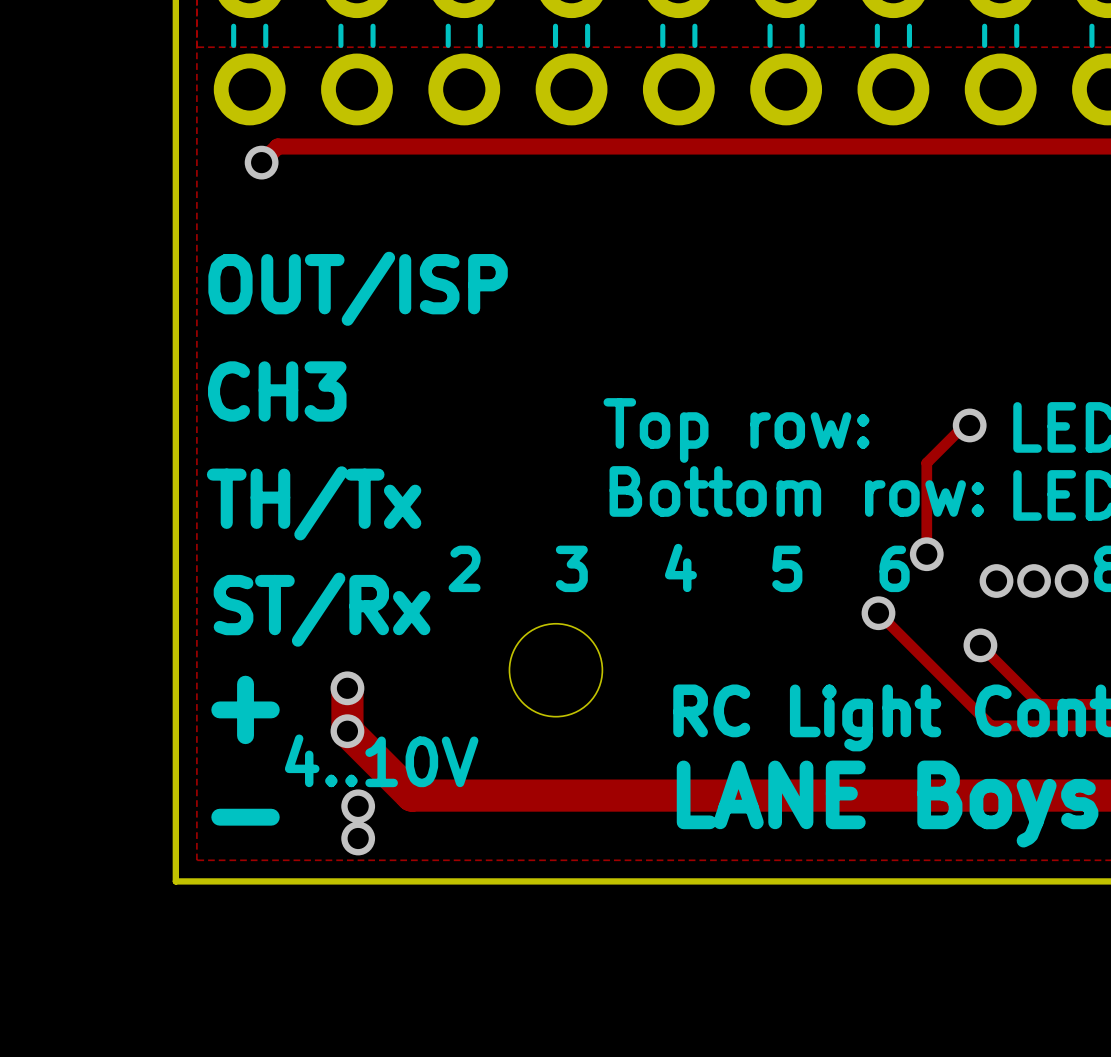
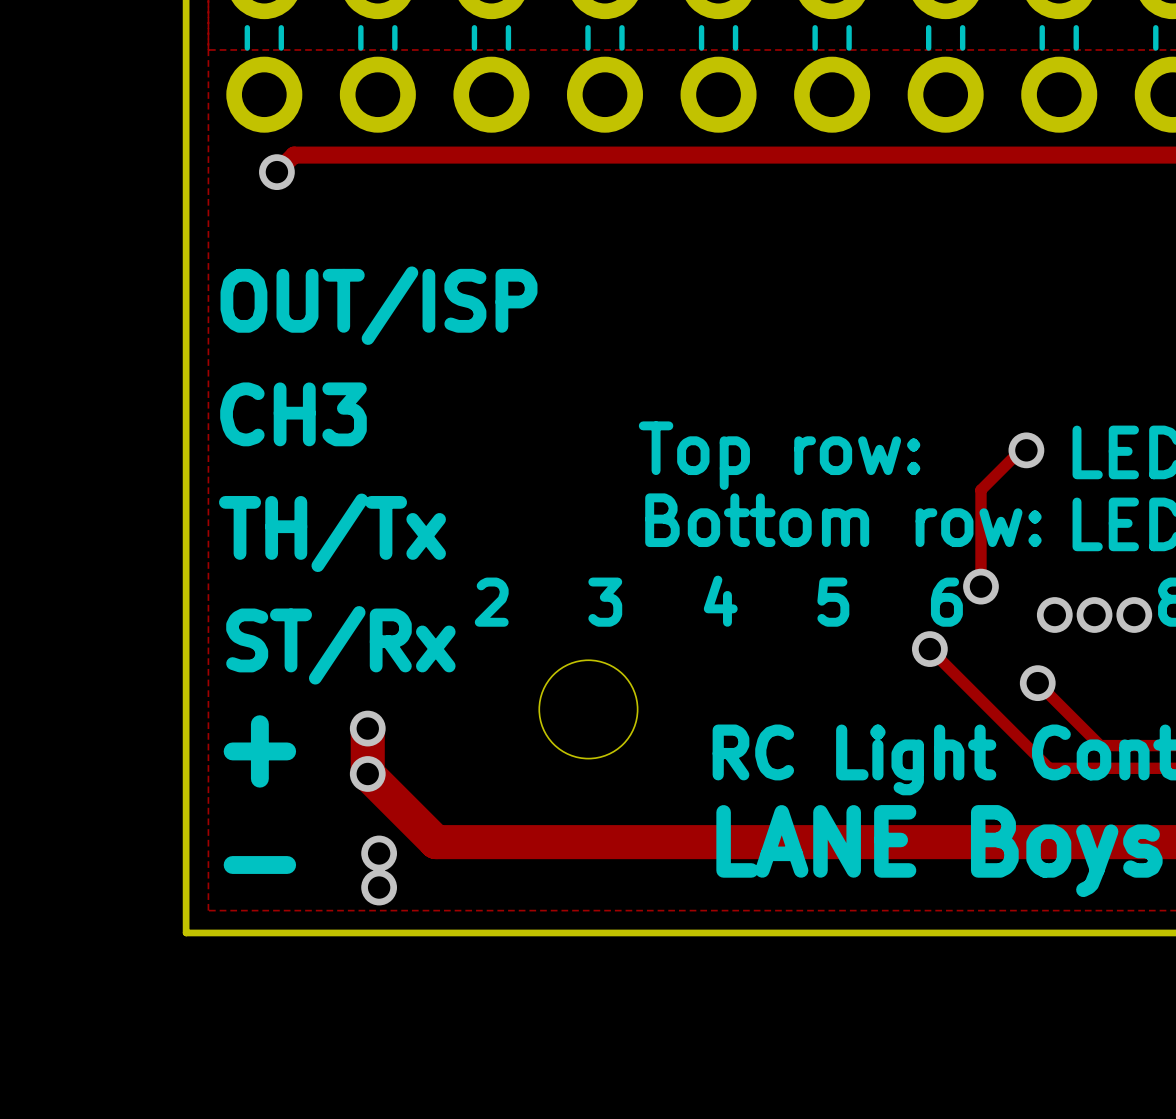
text: 4..10V (381, 760) -> none

